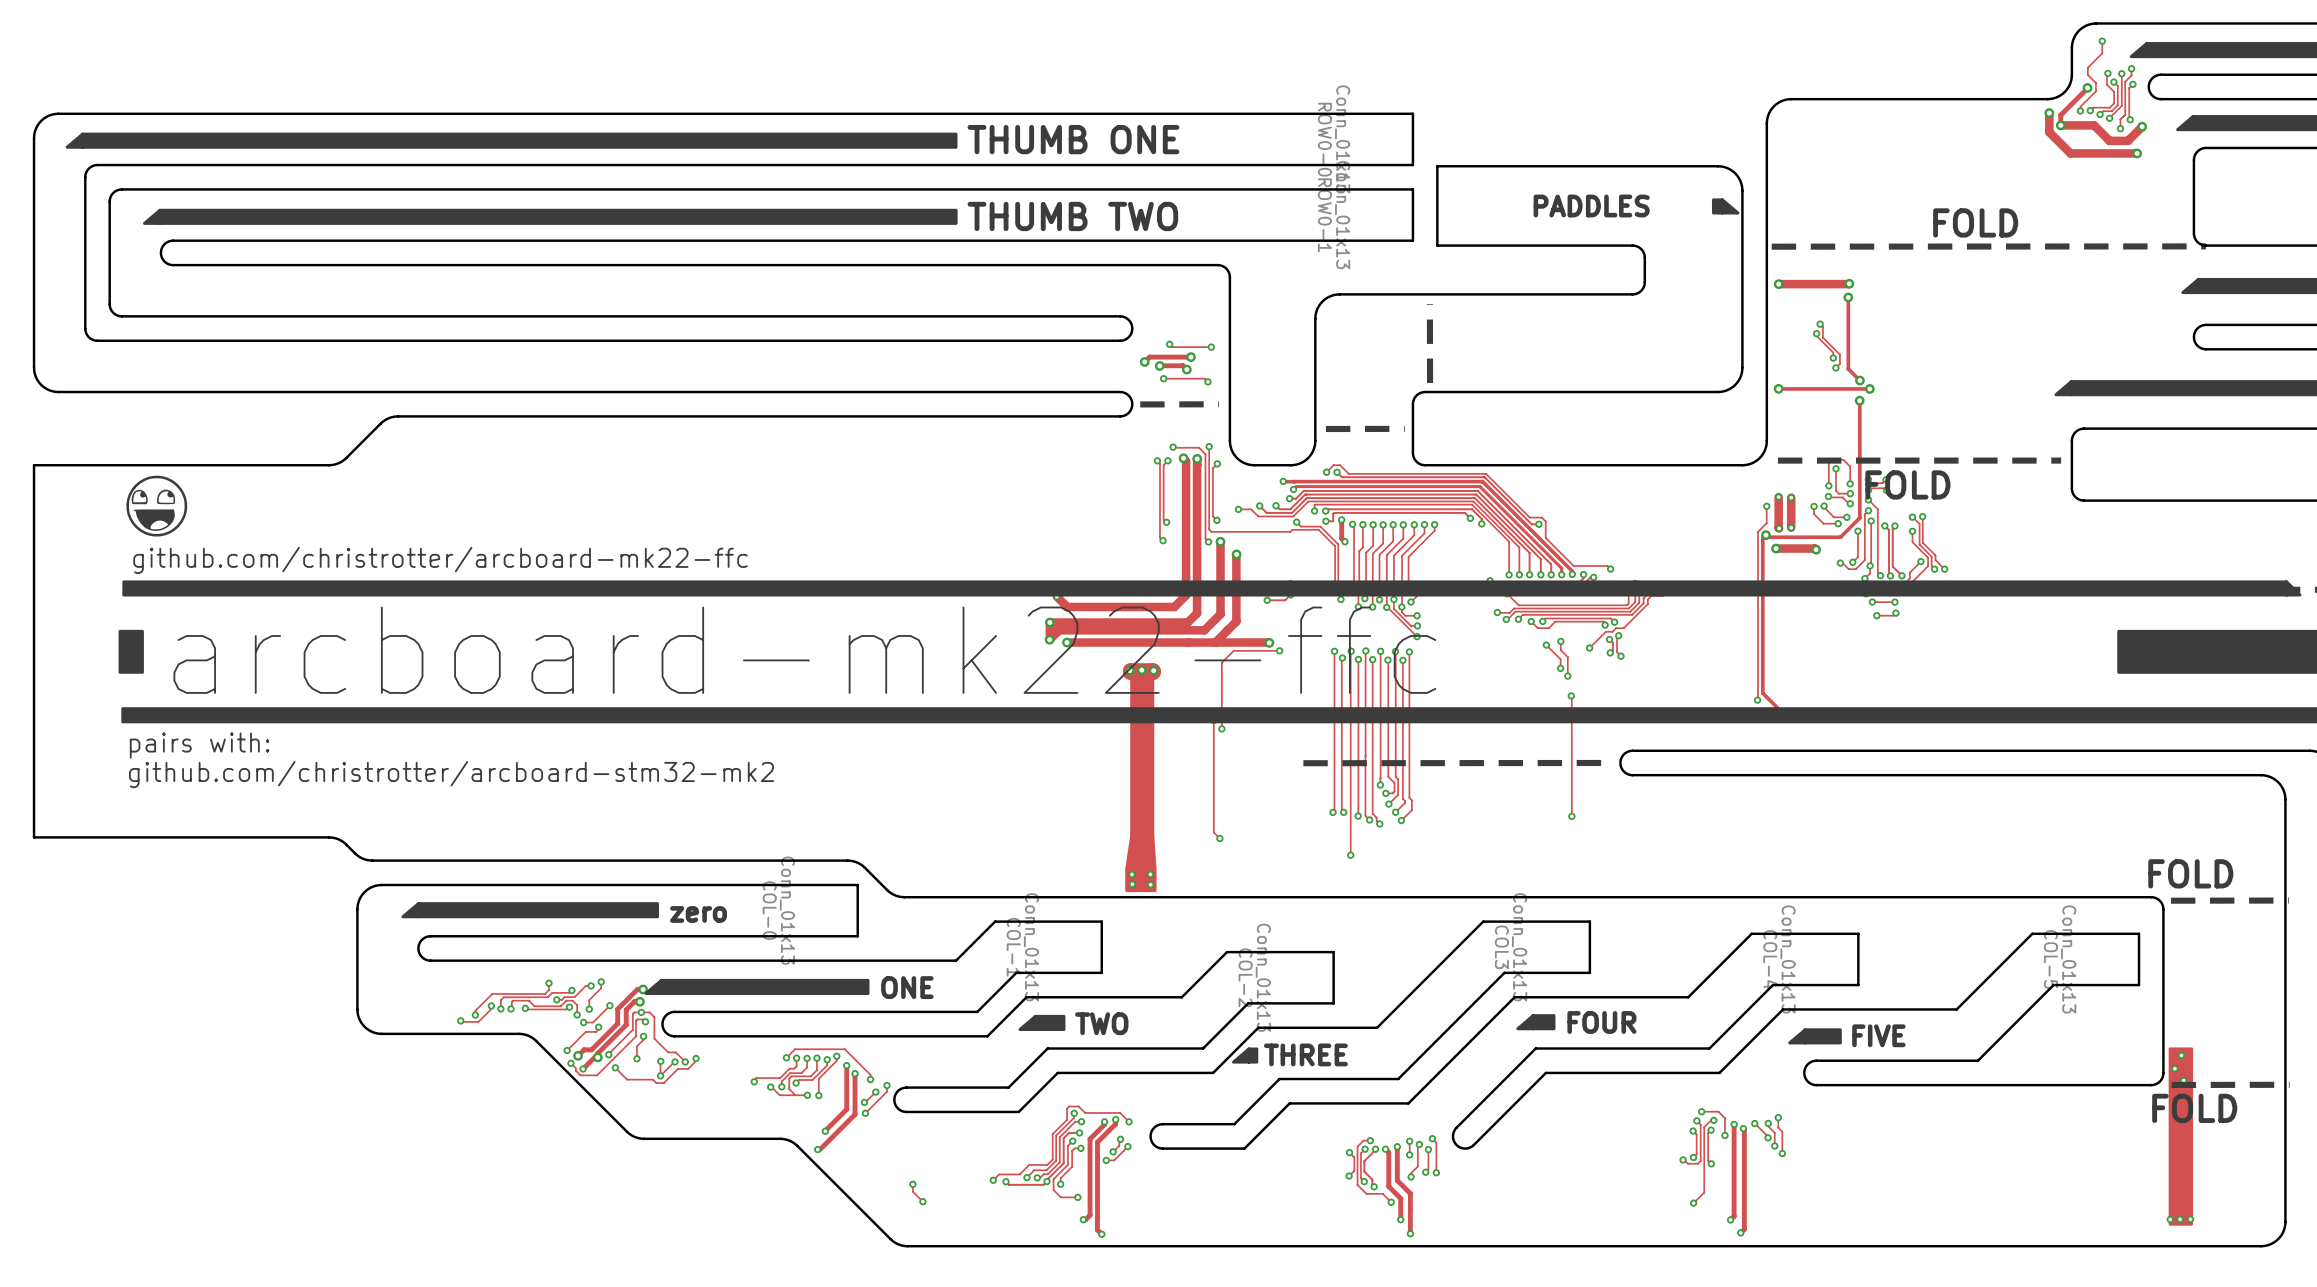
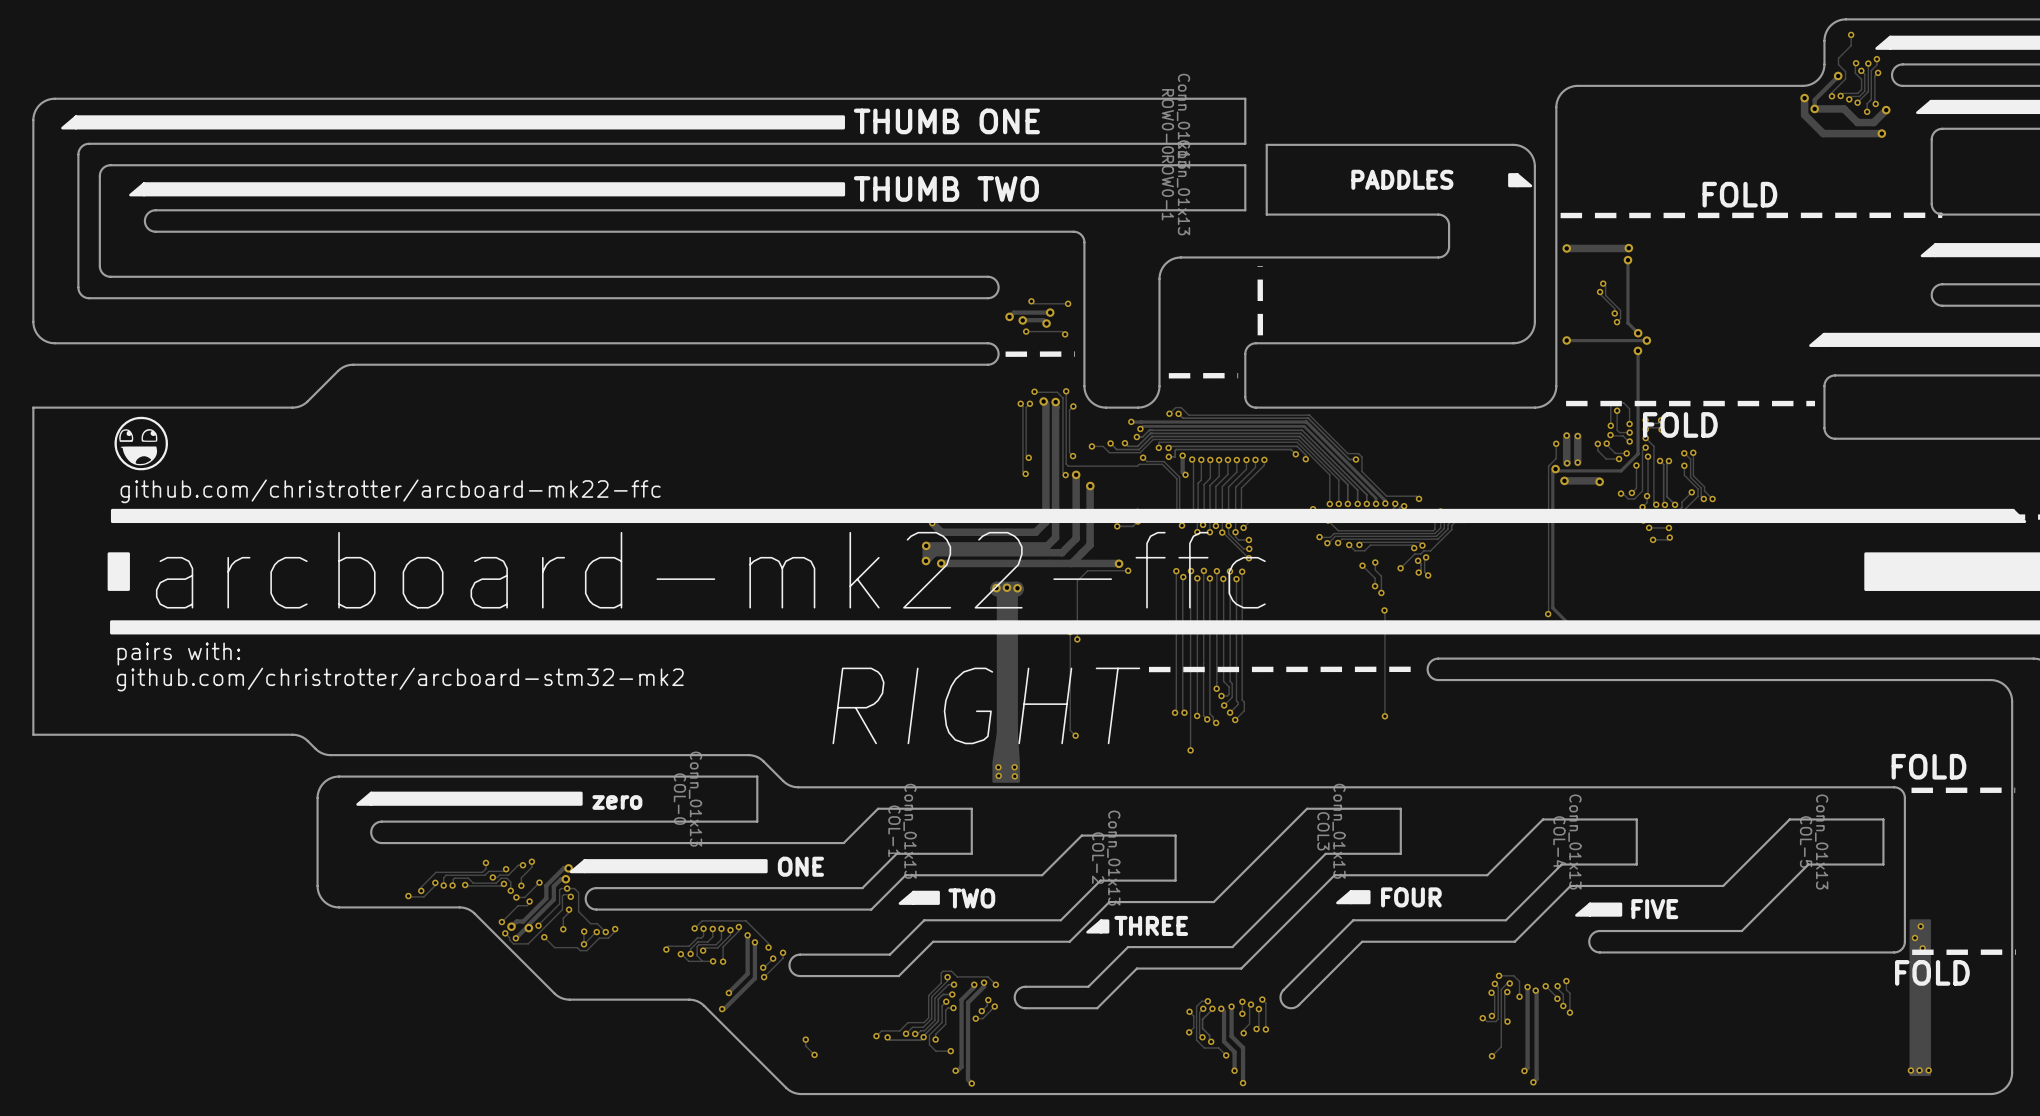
text: none -> RIGHT (986, 705)

